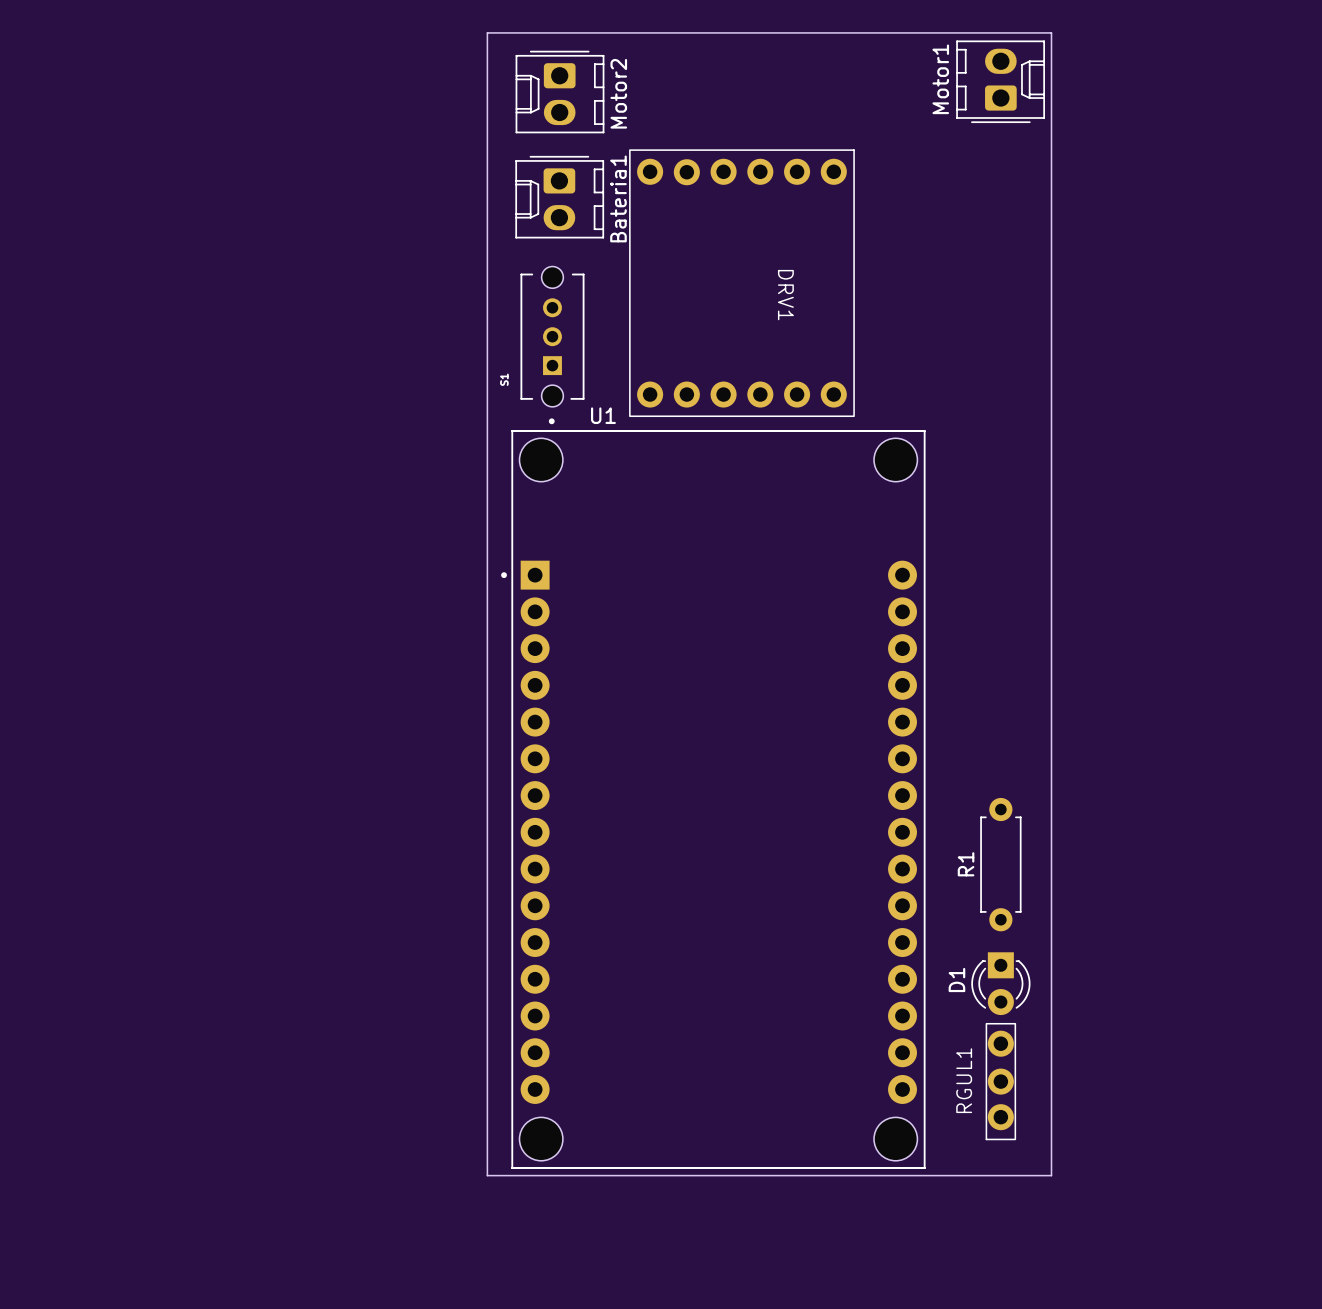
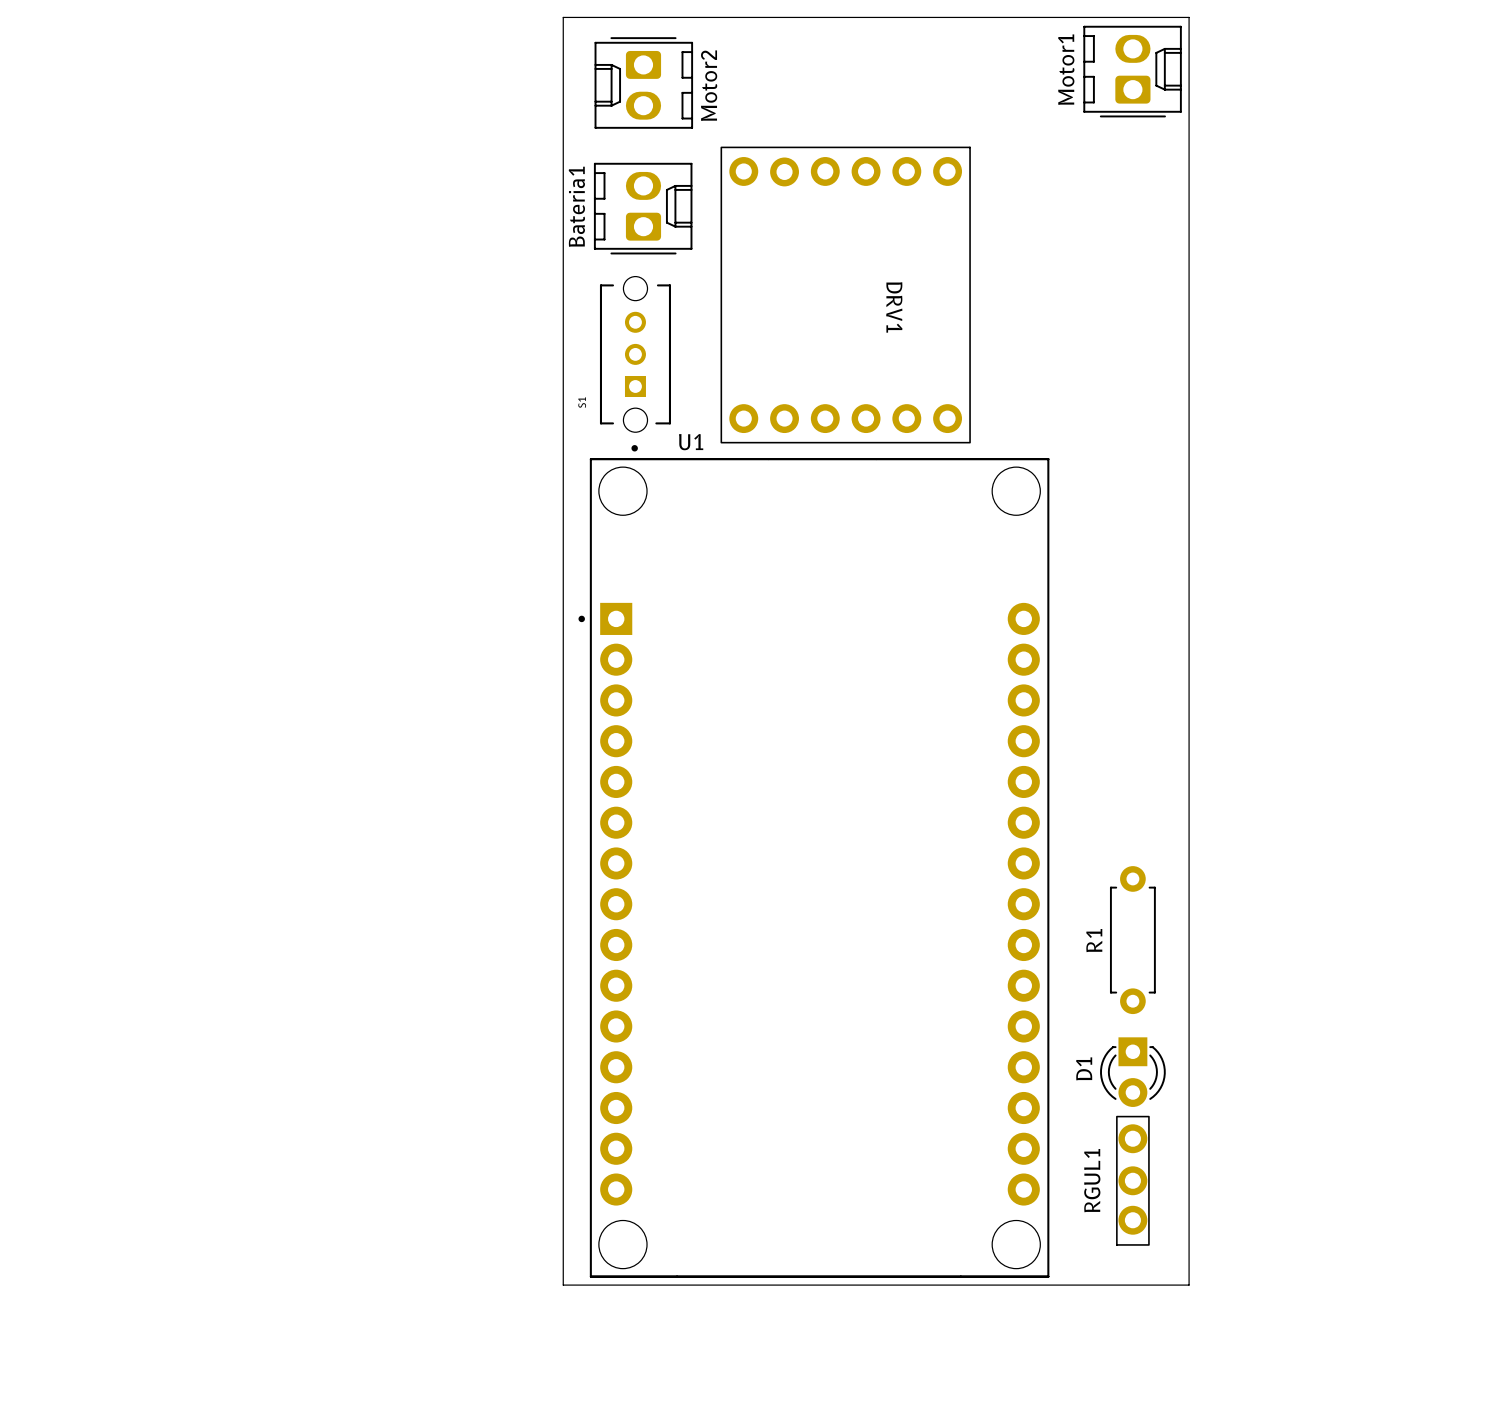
Bateria1 rotation: 0° (559, 197) -> 180° (643, 208)

